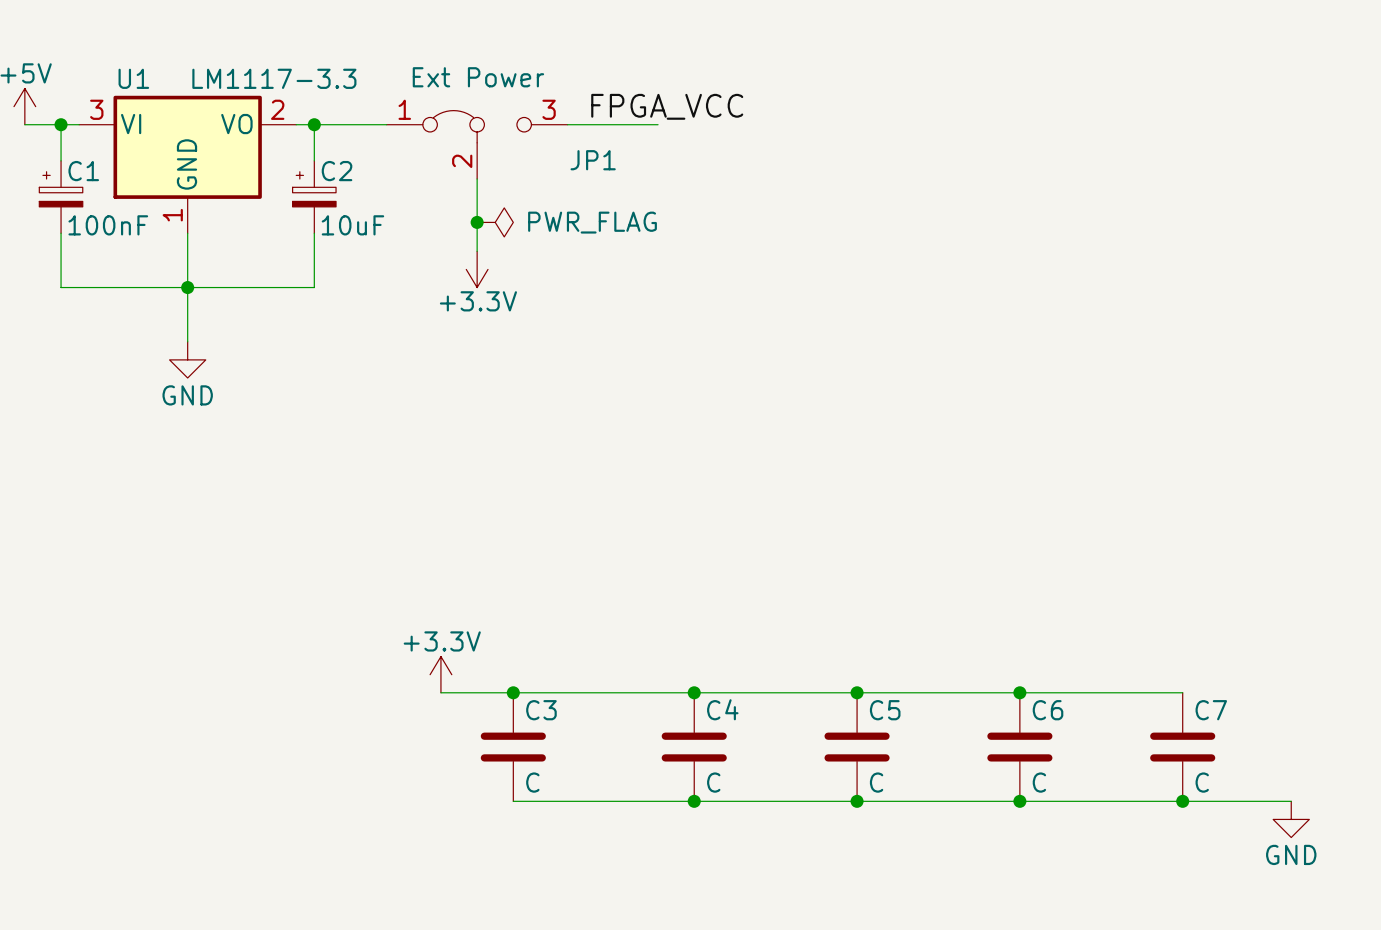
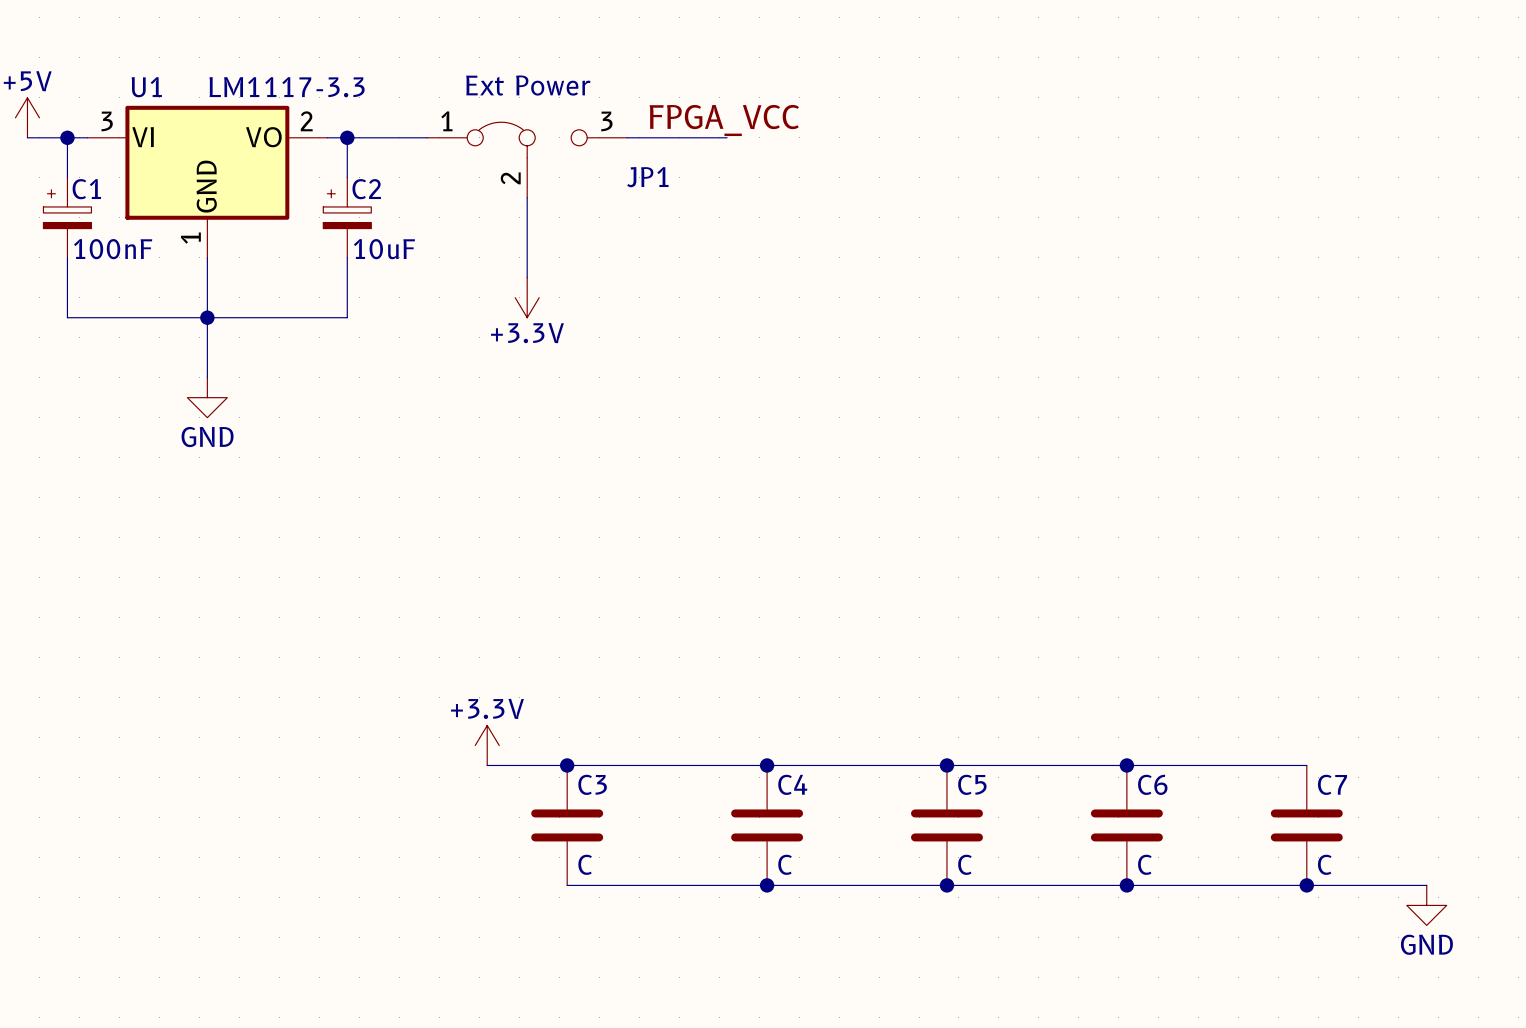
junction: (477, 222) -> none
power symbol: PWR_FLAG (495, 222) -> none

